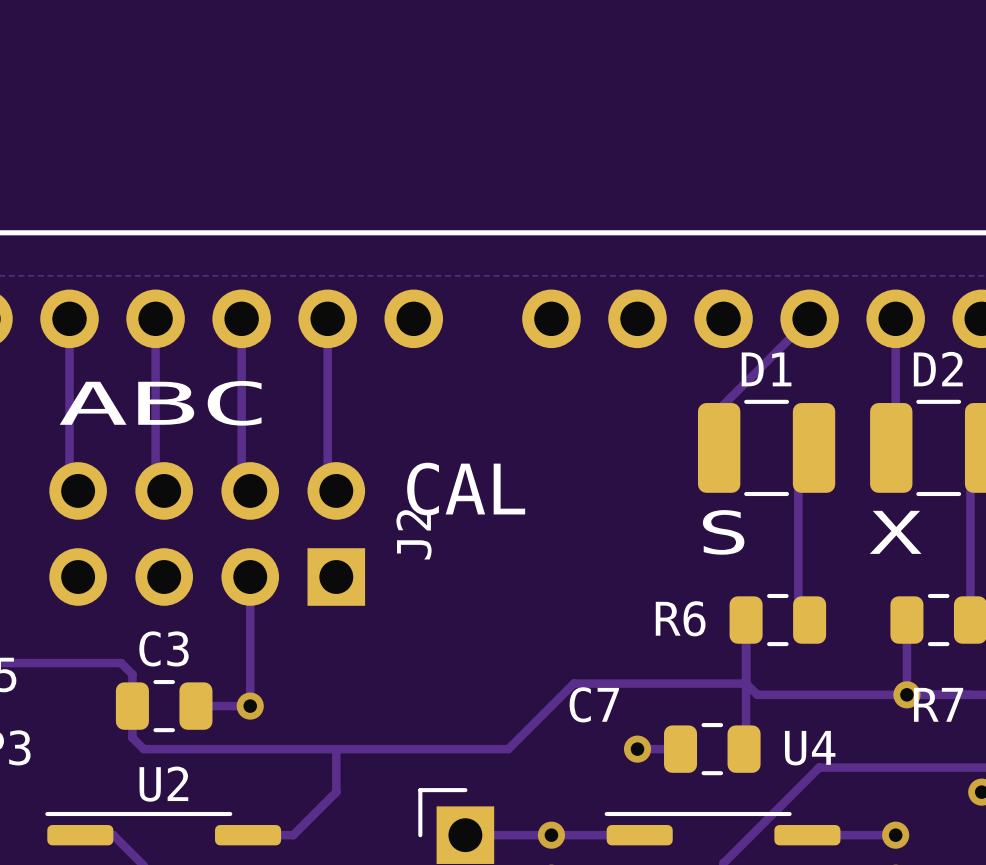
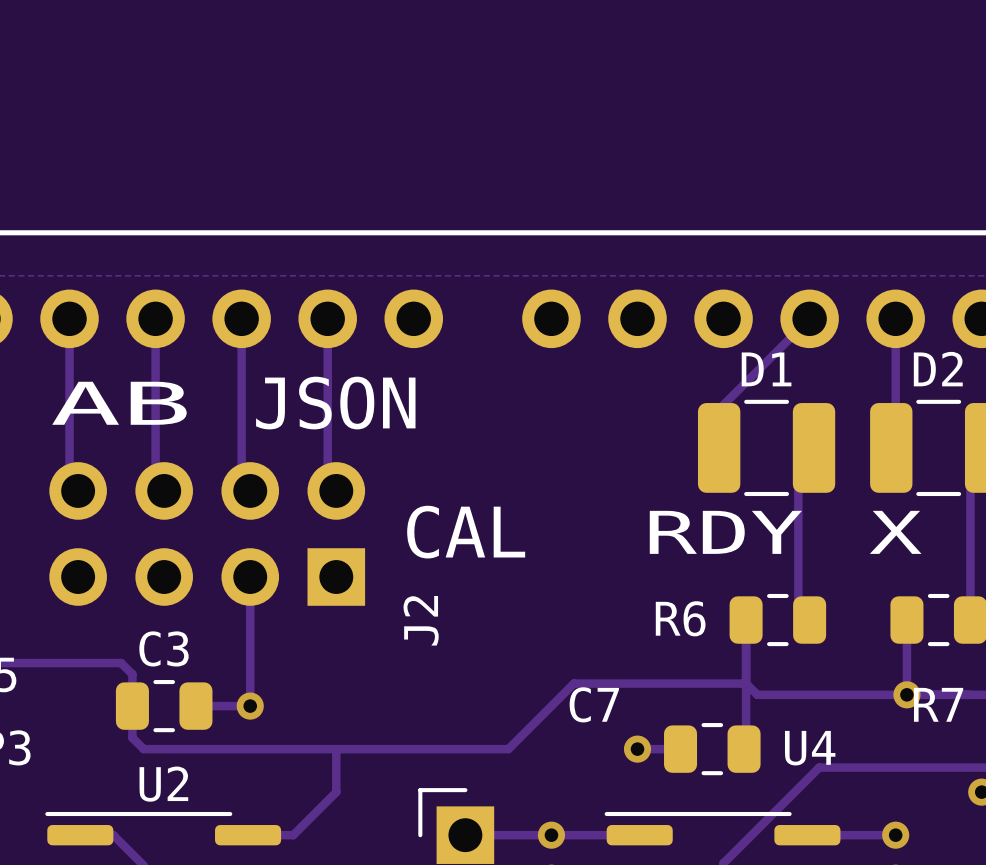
text: ABC (160, 403) -> AB (119, 403)
text: none -> JSON (335, 403)
text position: CAL (466, 489) -> CAL (466, 532)
text: S (723, 532) -> RDY (725, 532)
J2 name position: J2 (414, 534) -> J2 (421, 620)

